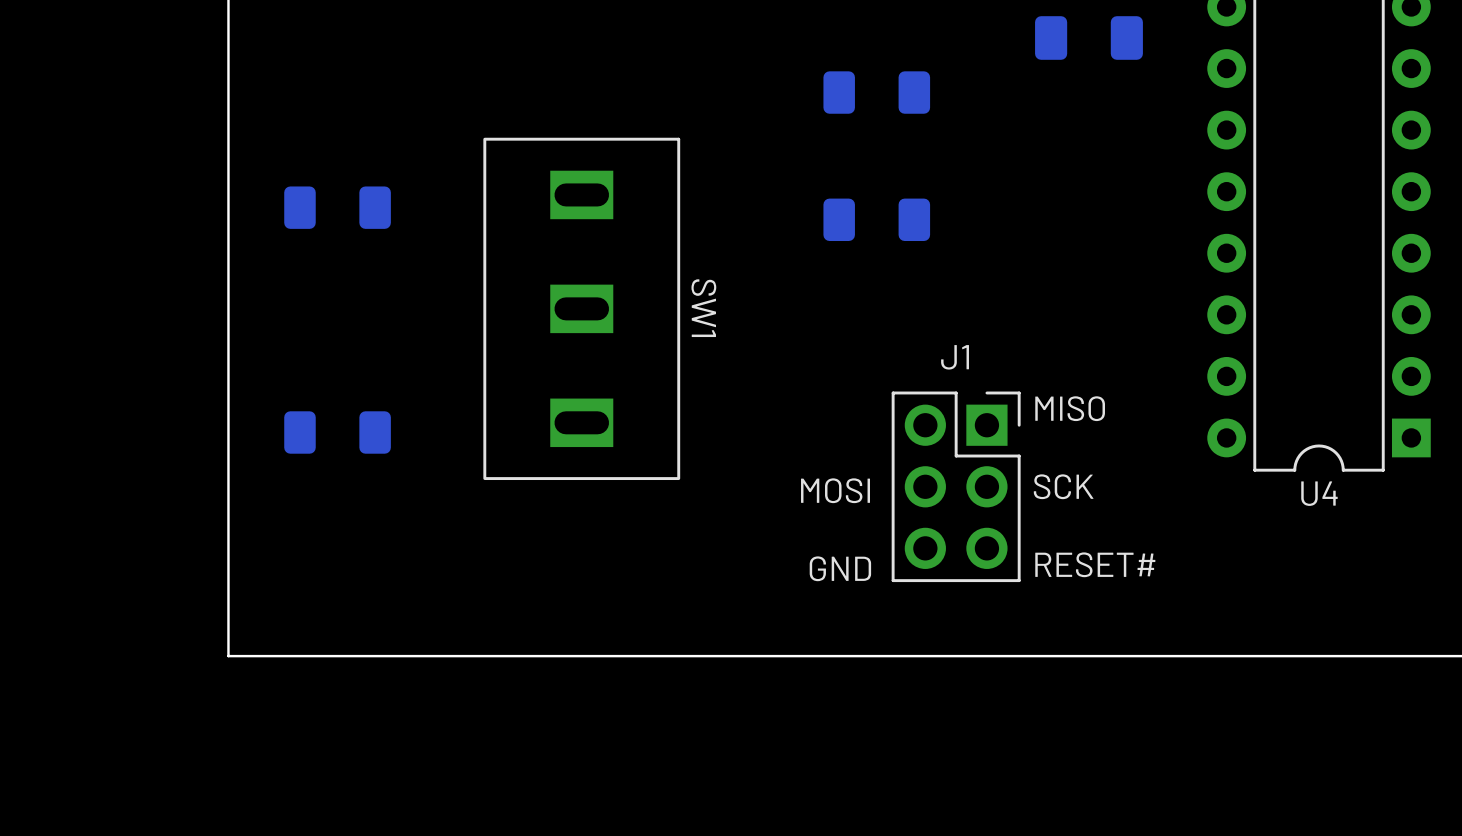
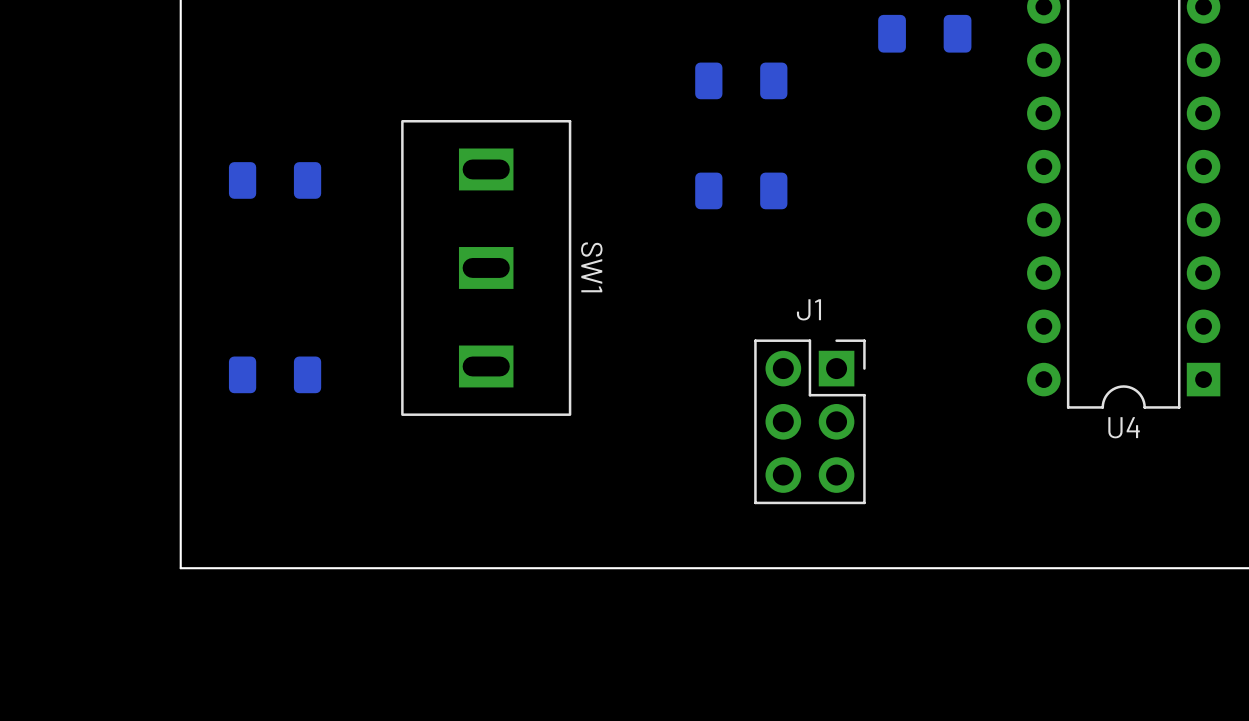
text: MISO (1070, 408) -> none
text: SCK (1063, 486) -> none
text: MOSI (835, 490) -> none
text: RESET# (1095, 564) -> none
text: GND (840, 568) -> none

